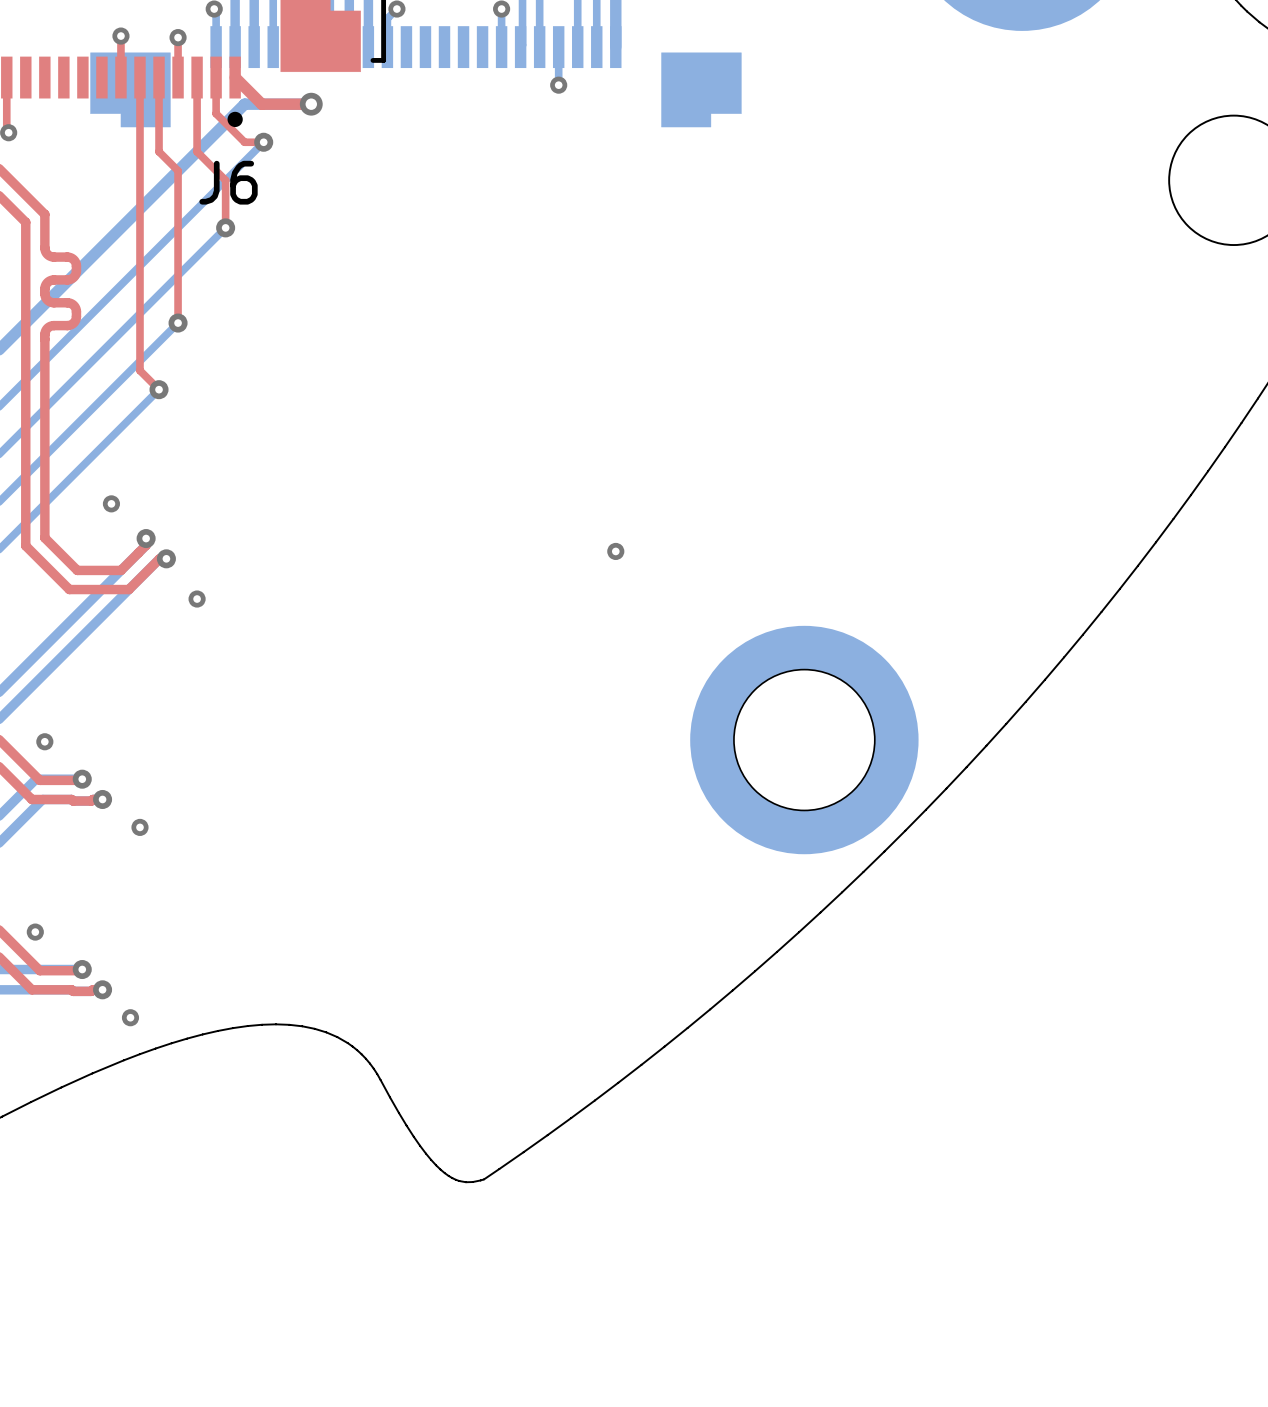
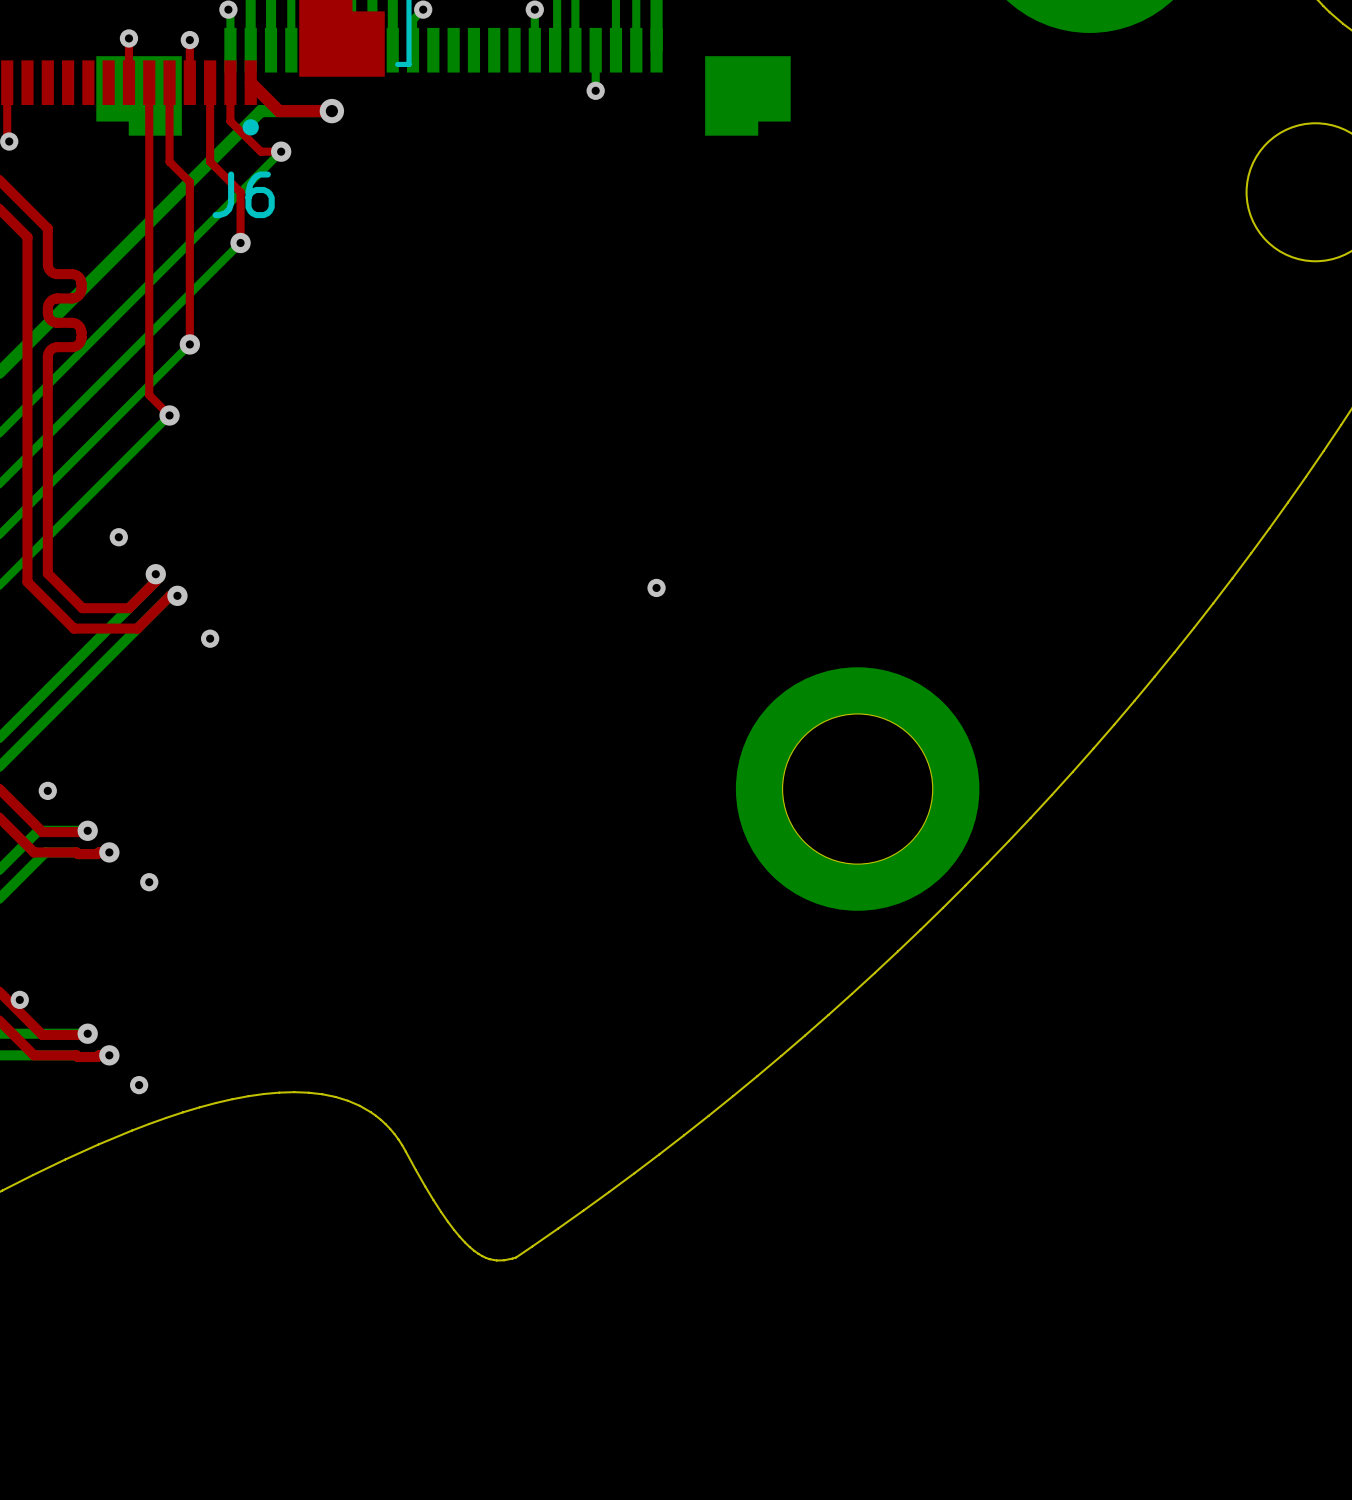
via position: (35, 932) -> (19, 999)

